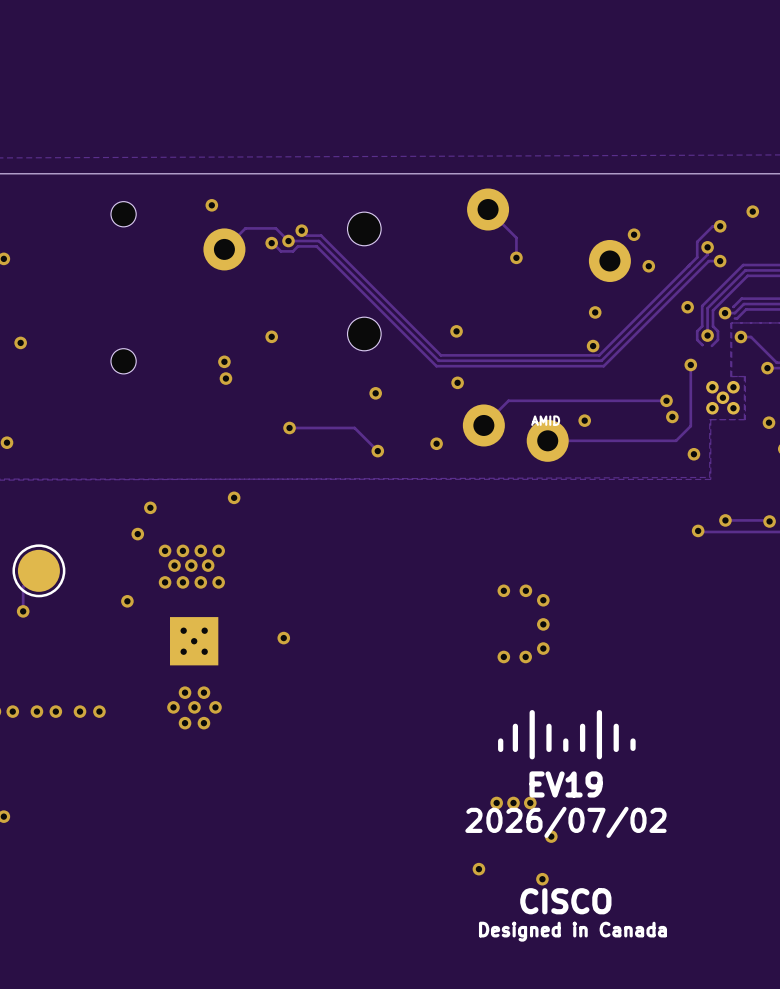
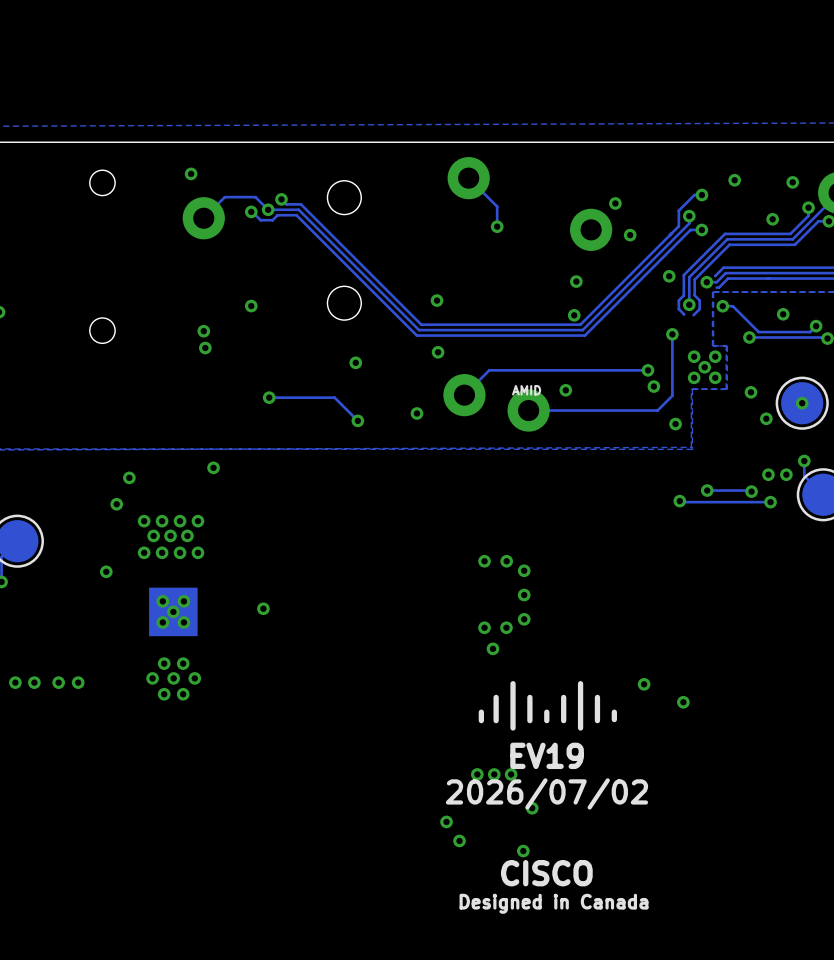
via: none -> (492, 648)
via: none -> (644, 684)
via: none -> (683, 702)
via: none -> (446, 821)

